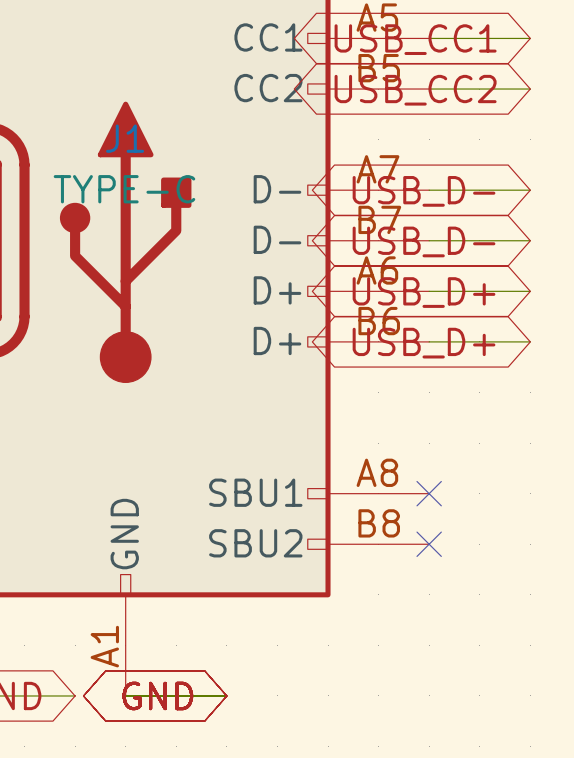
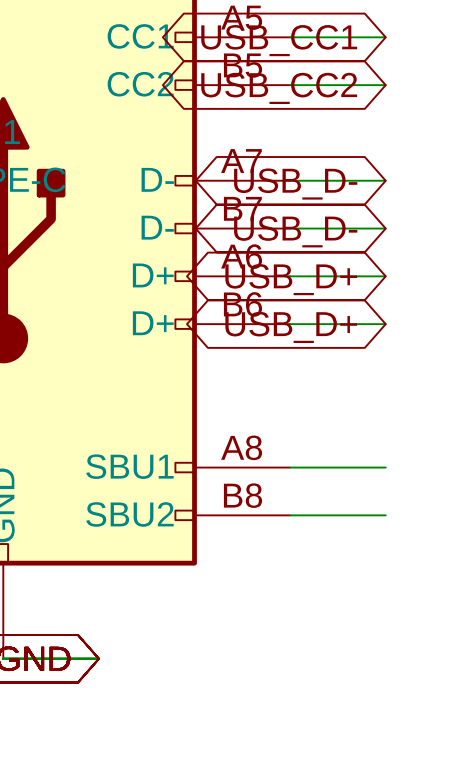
wire: none -> (290, 467) (385, 467)
no-connect mark: (429, 493) -> none
wire: none -> (290, 515) (385, 515)
no-connect mark: (429, 544) -> none

